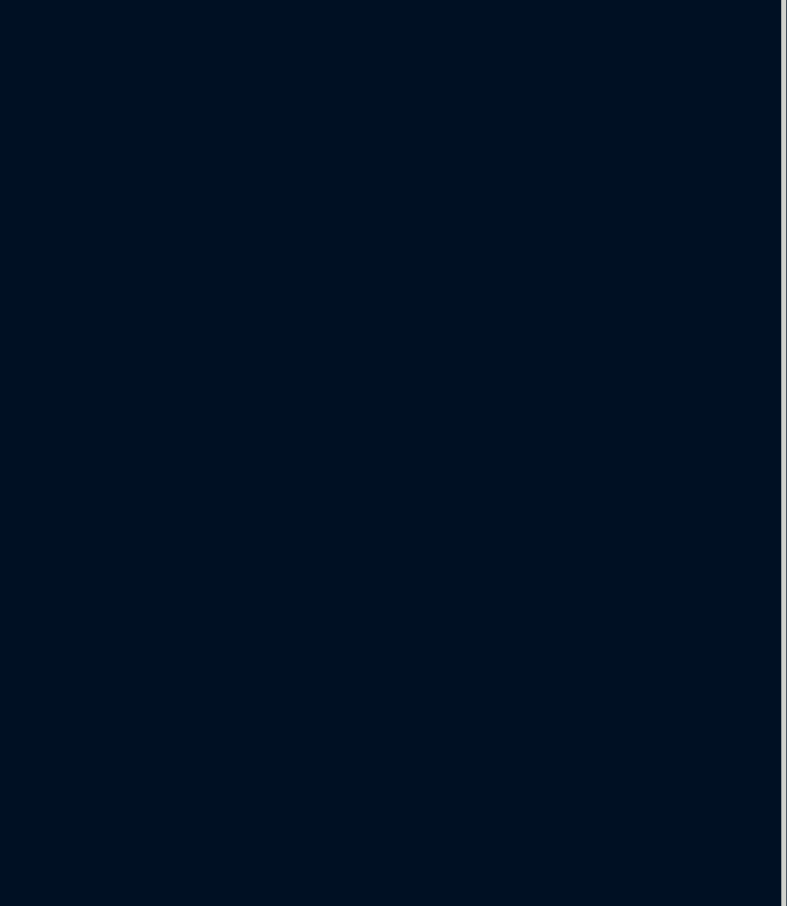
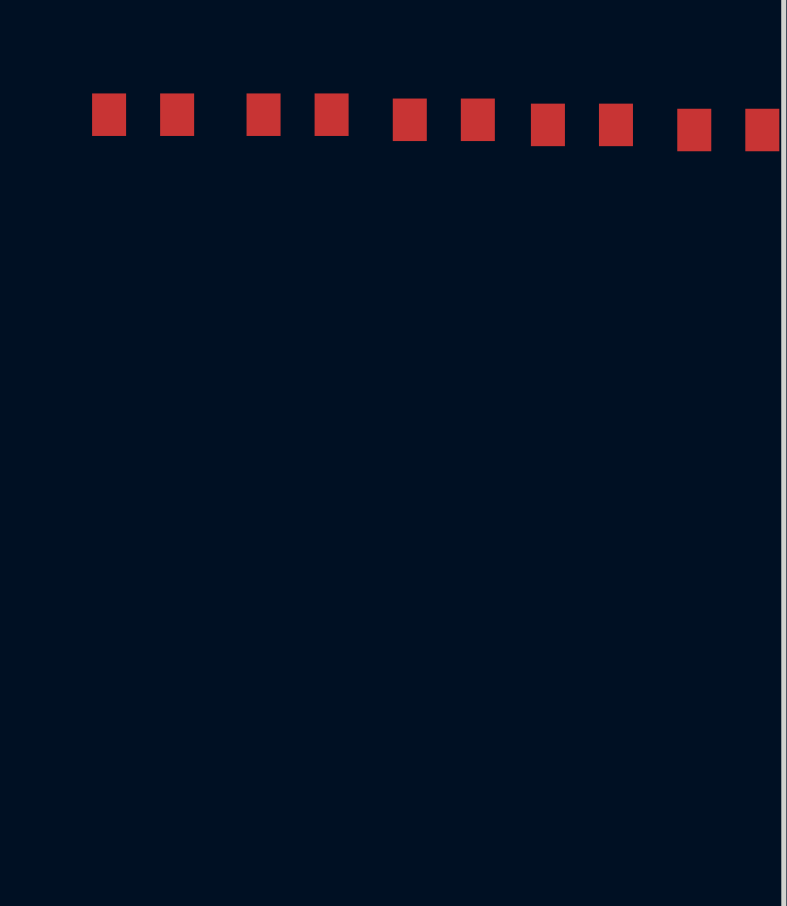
part: none -> (143, 114)
part: none -> (297, 114)
part: none -> (443, 119)
part: none -> (581, 124)
part: none -> (728, 130)

